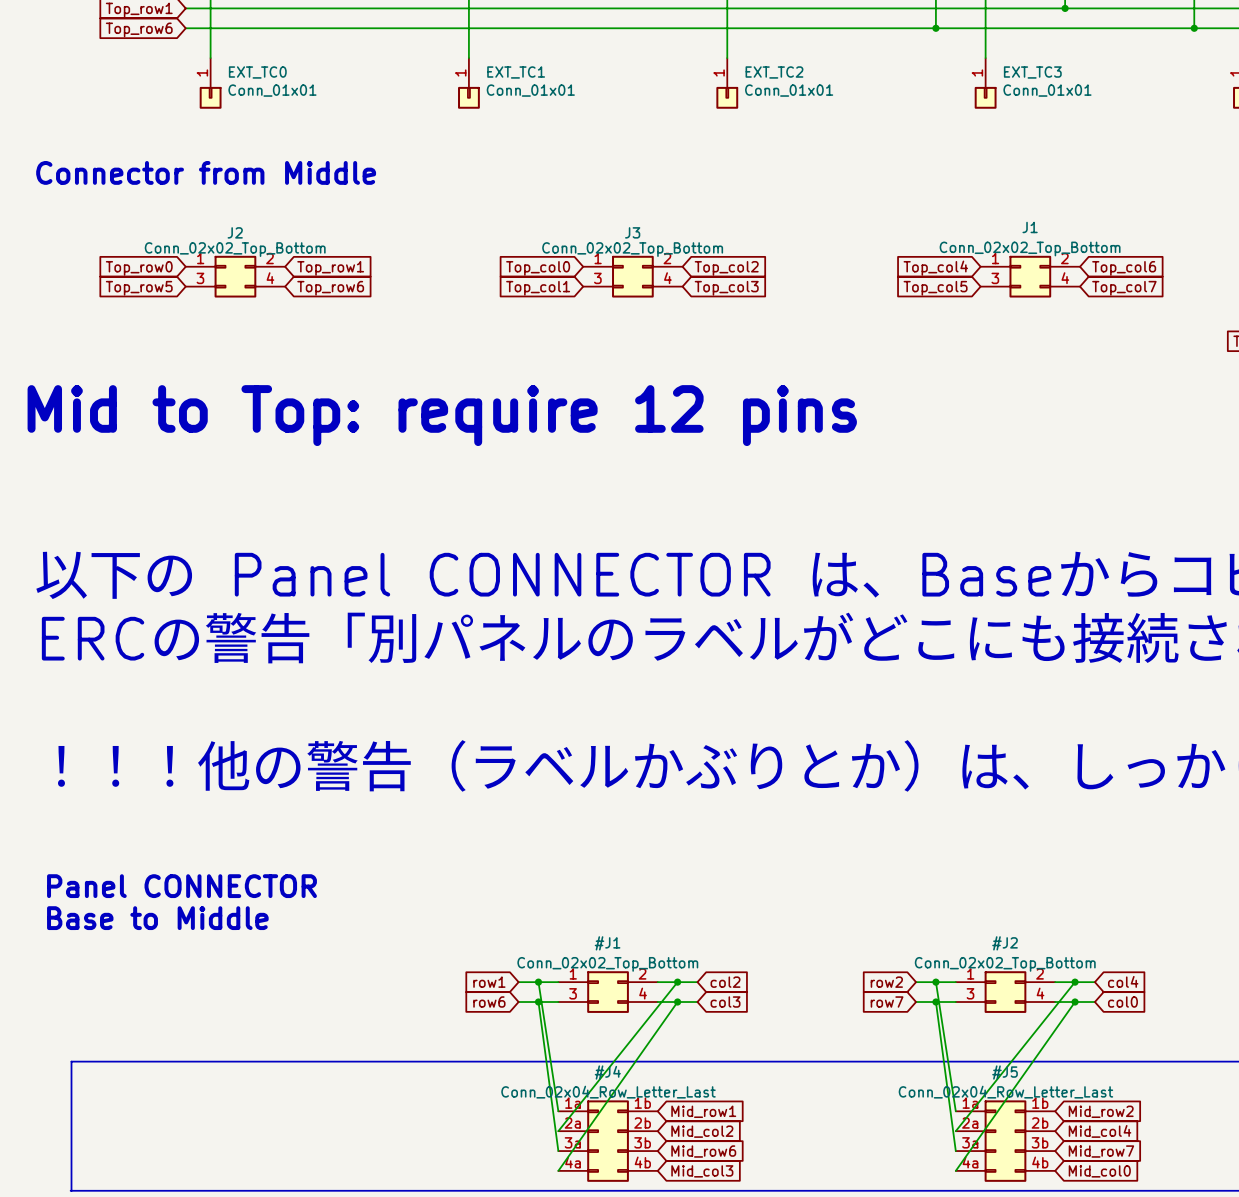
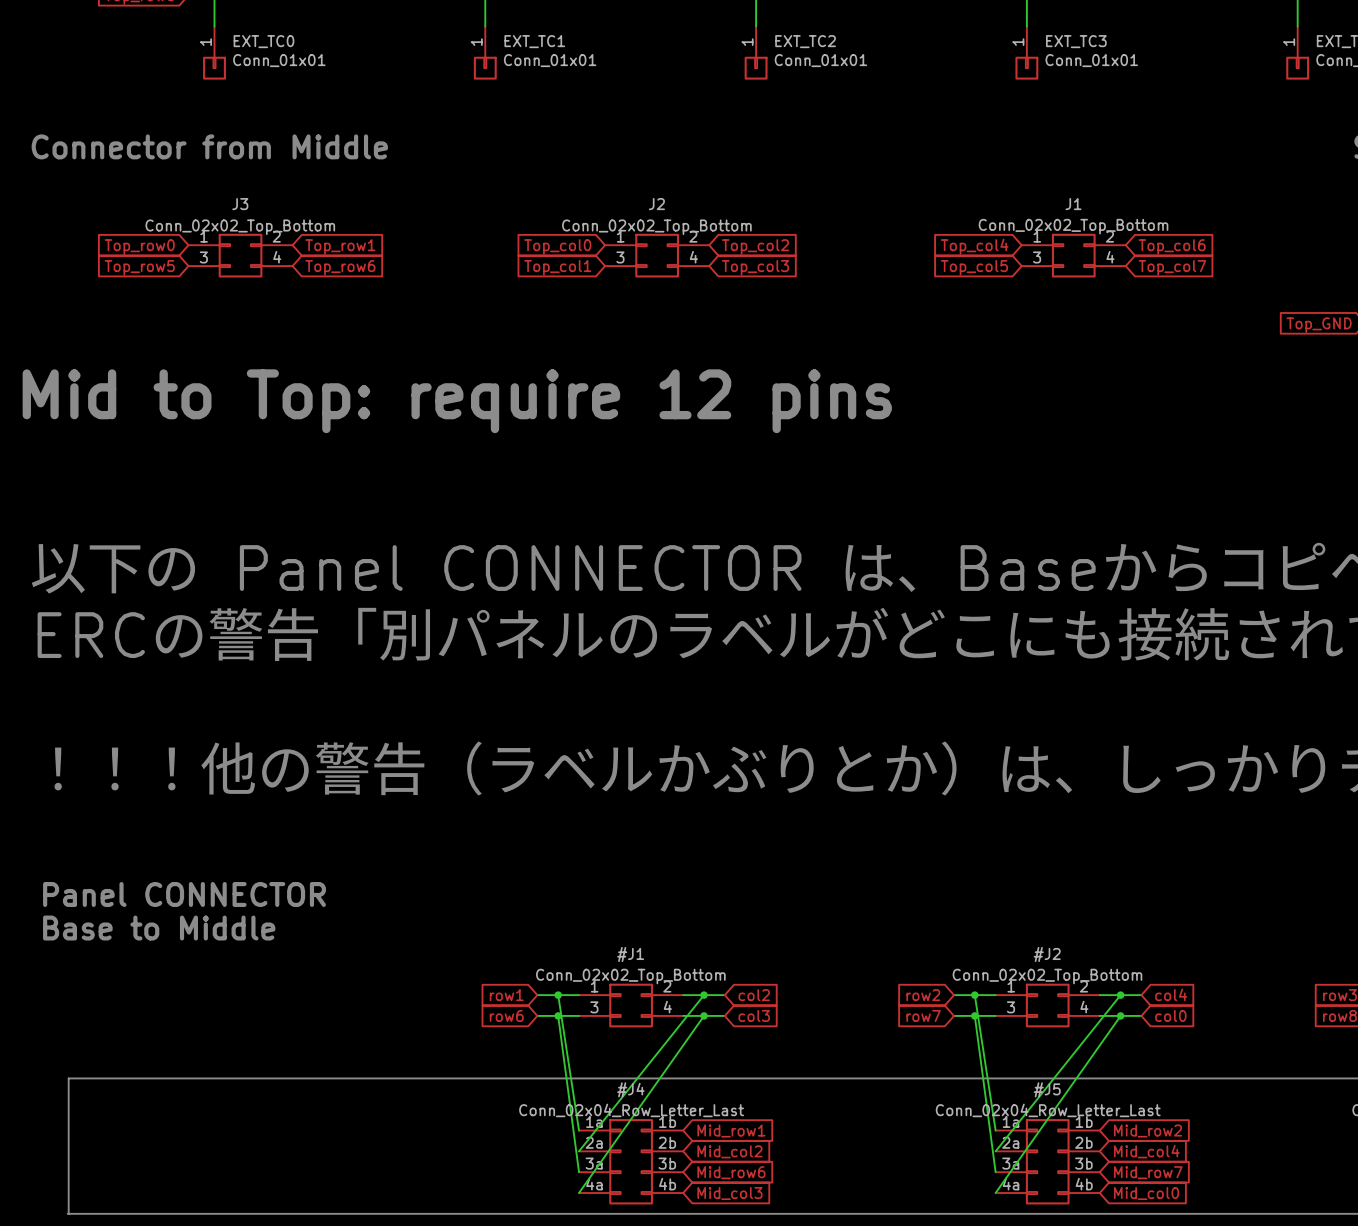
J2 name: J2 (235, 232) -> J3 (240, 204)
J3 name: J3 (632, 232) -> J2 (656, 204)

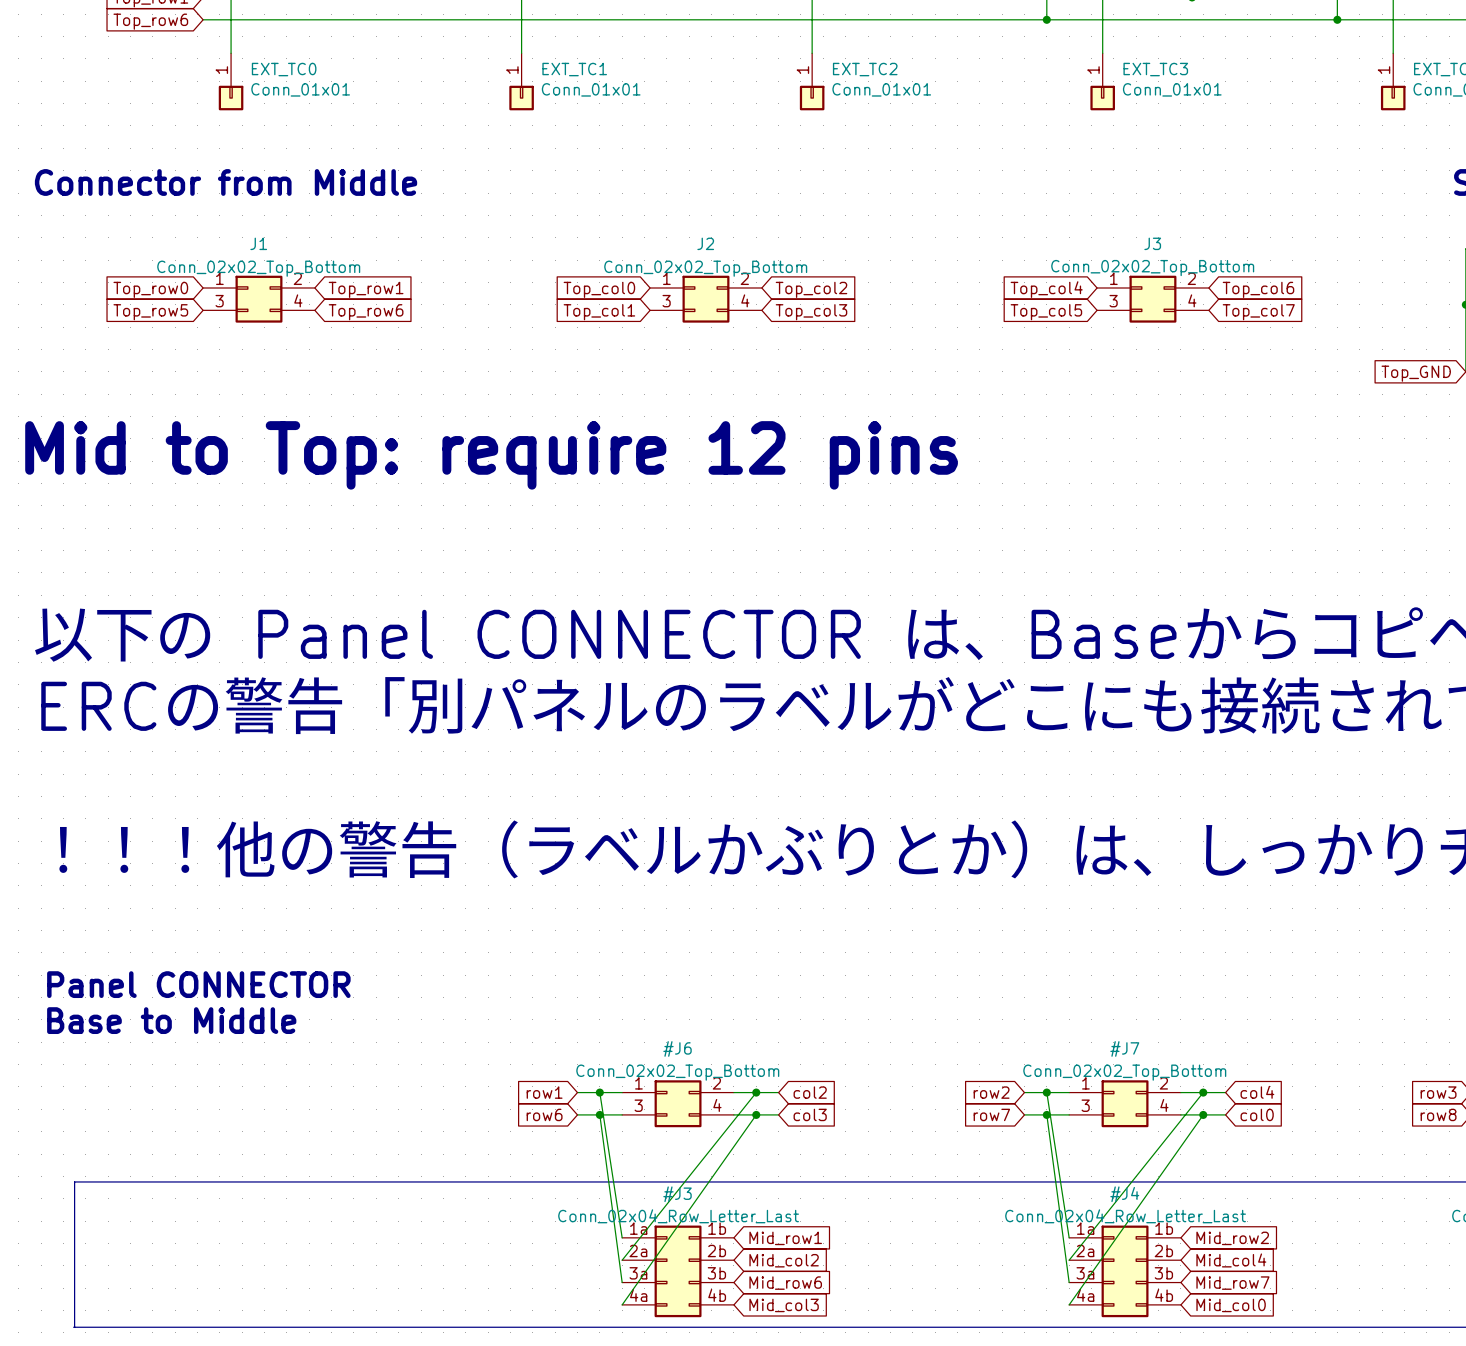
J3 name: J3 (240, 204) -> J1 (258, 243)
J1 name: J1 (1073, 204) -> J3 (1152, 243)
#J1 name: #J1 (630, 954) -> #J6 (677, 1048)
#J2 name: #J2 (1047, 954) -> #J7 (1124, 1048)
#J4 name: #J4 (630, 1089) -> #J3 (677, 1194)
#J5 name: #J5 (1047, 1089) -> #J4 (1124, 1194)

